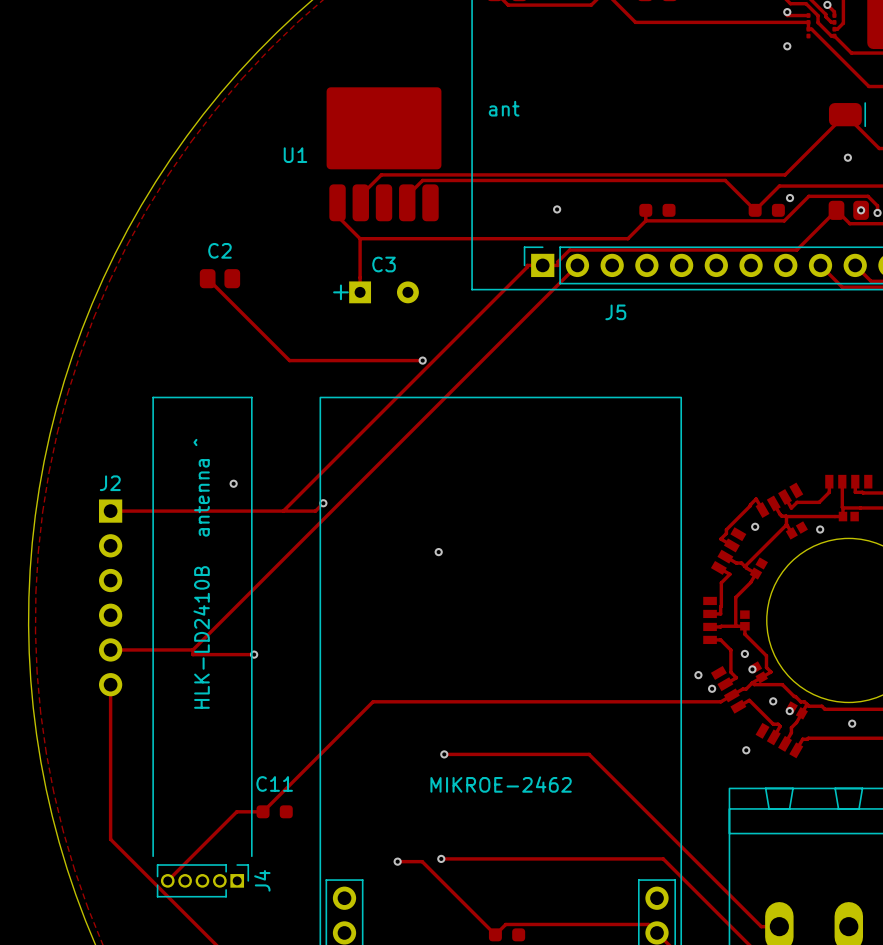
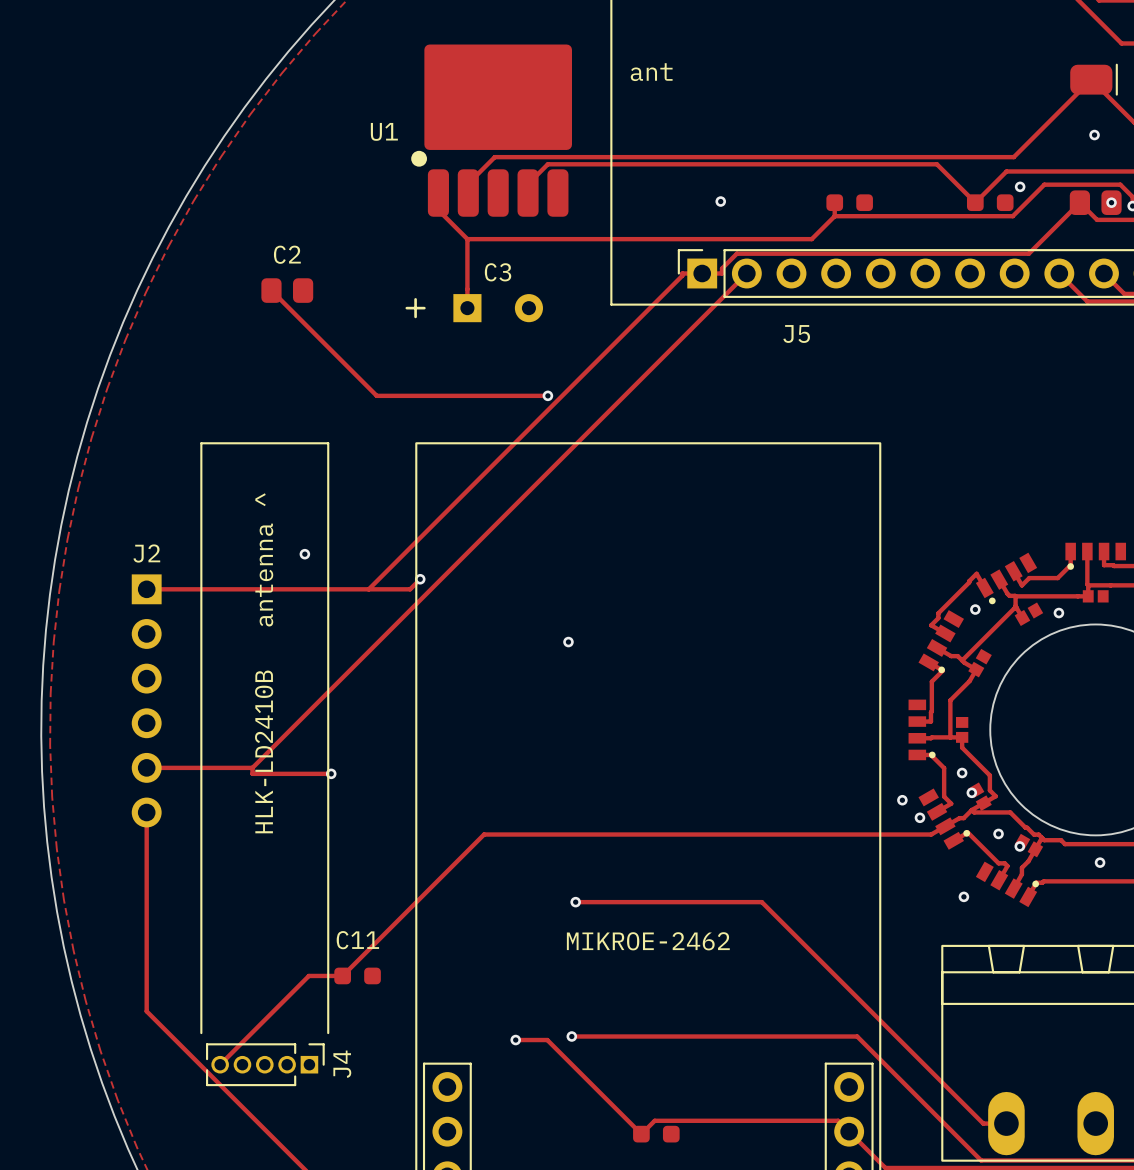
part footprint: [326, 87, 442, 222] -> [411, 44, 572, 217]
part footprint: [333, 281, 419, 304] -> [405, 294, 543, 323]
part footprint: [825, 474, 873, 489] -> [1065, 542, 1127, 570]
part footprint: [755, 482, 804, 518] -> [975, 552, 1038, 605]
part footprint: [710, 527, 747, 575] -> [918, 610, 965, 674]
part footprint: [703, 596, 717, 645] -> [908, 699, 936, 761]
part footprint: [710, 665, 747, 714] -> [918, 788, 971, 850]
part footprint: [755, 722, 804, 759] -> [975, 861, 1040, 908]

